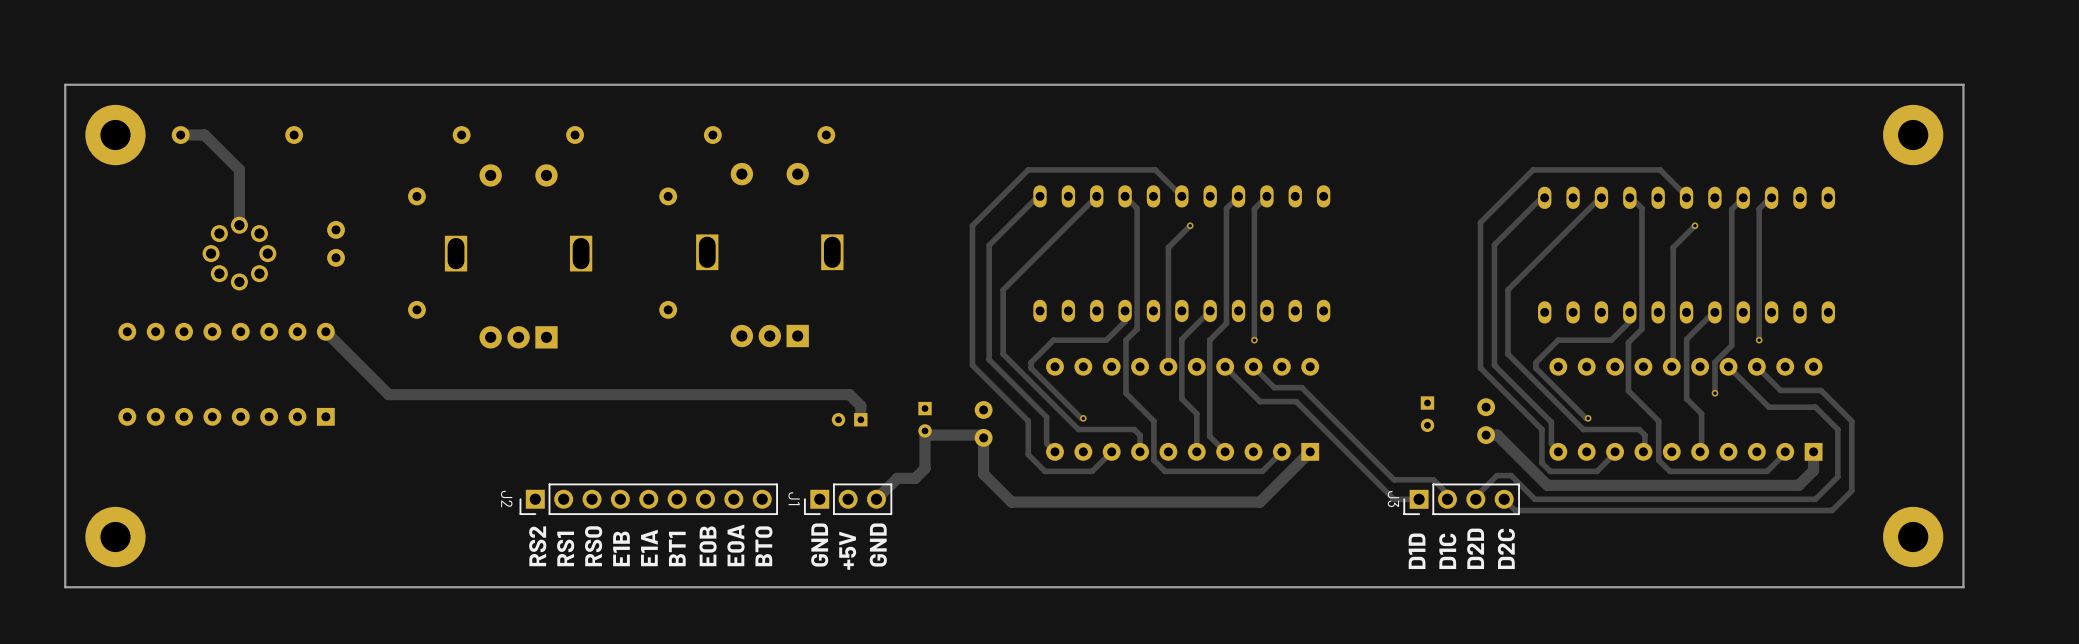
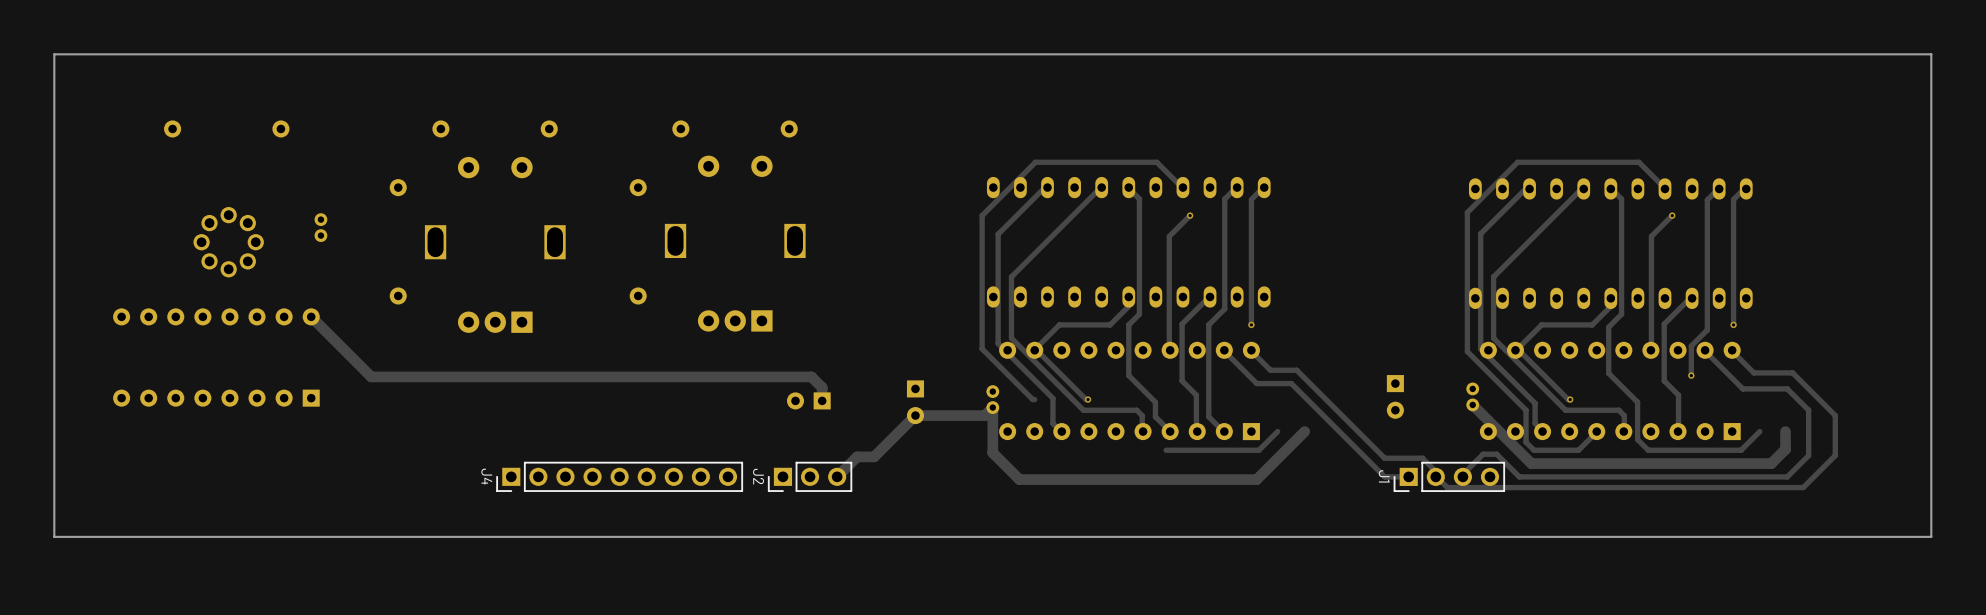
board edge: (1963, 84) (65, 84) (65, 587) (1963, 587) (1963, 84) -> (1931, 54) (1931, 536) (54, 536) (54, 54) (1931, 54)
part: (115, 135) -> none
track: (180, 135) (204, 135) (239, 169) (239, 225) -> none
part: (1913, 135) -> none
track: (1084, 169) (1028, 169) (972, 225) (972, 365) (1028, 421) (1028, 454) (1045, 471) (1092, 471) (1111, 451) -> (1035, 162) (982, 215) (982, 348) (984, 351)
track: (1155, 169) (1181, 196) -> (1103, 162) (1156, 162) (1182, 187)
track: (1588, 169) (1533, 169) (1480, 222) (1480, 368) (1541, 429) (1541, 463) (1550, 471) (1596, 471) (1616, 451) -> (1517, 162) (1467, 212) (1467, 351) (1526, 410) (1526, 442) (1534, 450) (1578, 450) (1597, 431)
track: (1660, 169) (1686, 196) -> (1585, 162) (1638, 162) (1664, 187)
track: (1040, 196) (989, 245) (989, 359) (1046, 417) (1046, 443) (1054, 451) -> (1046, 187) (998, 234) (998, 343) (1052, 398) (1052, 423) (1060, 431)
track: (1096, 196) (1003, 289) (1003, 354) (1078, 429) (1134, 429) (1140, 435) (1140, 451) -> (1100, 187) (1011, 276) (1011, 338) (1083, 410) (1136, 410) (1142, 415) (1142, 431)
track: (1125, 196) (1137, 208) (1137, 329) (1125, 340) (1125, 393) (1153, 421) (1153, 460) (1165, 471) (1220, 471) -> none
track: (1238, 196) (1226, 208) (1226, 323) (1209, 340) (1209, 421) -> none
track: (1266, 196) (1254, 208) (1254, 340) -> (1263, 187) (1251, 199) (1251, 324)
track: none -> (1236, 187) (1224, 199) (1224, 308) (1208, 324) (1208, 416) (1223, 431)
track: (1544, 196) (1494, 244) (1494, 365) (1551, 422) (1551, 443) (1559, 451) -> (1528, 187) (1480, 233) (1480, 348) (1535, 403) (1535, 423) (1543, 431)
track: (1601, 196) (1507, 289) (1507, 354) (1583, 429) (1639, 429) (1644, 435) (1644, 451) -> (1582, 187) (1493, 276) (1493, 338) (1565, 410) (1618, 410) (1624, 415) (1624, 431)
track: (1629, 196) (1641, 208) (1641, 329) (1628, 342) (1628, 390) (1658, 421) (1658, 460) (1669, 471) (1725, 471) -> (1610, 187) (1621, 199) (1621, 314) (1608, 327) (1608, 373) (1637, 402) (1637, 439) (1648, 450)
track: (1771, 196) (1759, 208) (1759, 340) -> (1745, 187) (1733, 199) (1733, 324)
track: (1743, 197) (1731, 209) (1731, 345) (1714, 362) (1714, 393) -> (1718, 188) (1707, 199) (1707, 330) (1691, 346) (1691, 375)
part footprint: [327, 221, 345, 267] -> [314, 213, 328, 243]
track: (1190, 225) (1168, 247) (1168, 366) -> (1190, 215) (1169, 236) (1169, 350)
via position: (1190, 225) -> (1190, 215)
track: (1695, 225) (1673, 247) (1673, 366) -> (1672, 215) (1651, 236) (1651, 350)
via position: (1695, 225) -> (1672, 215)
track: (1125, 310) (1125, 321) (1106, 340) (1053, 340) (1031, 362) (1031, 368) -> none
track: none -> (1127, 296) (1127, 307) (1110, 324) (1059, 324) (1038, 346) (1038, 351) (1088, 399)
track: (1210, 310) (1181, 340) -> (1127, 187) (1139, 199) (1139, 314) (1128, 324)
track: none -> (1209, 296) (1182, 324) (1182, 380) (1196, 395) (1196, 431)
track: (1629, 310) (1629, 321) (1611, 340) (1558, 340) (1535, 362) (1535, 368) (1588, 418) -> (1610, 296) (1610, 307) (1592, 324) (1541, 324) (1520, 346) (1520, 351) (1570, 399)
track: (1714, 310) (1686, 339) (1686, 398) (1701, 413) (1701, 451) -> (1691, 296) (1664, 324) (1664, 380) (1678, 395) (1678, 431)
via position: (1254, 340) -> (1251, 324)
via: (1759, 340) -> none
via: none -> (1733, 324)
track: (1225, 366) (1259, 401) (1296, 401) (1393, 499) (1419, 499) -> none
track: (1253, 366) (1274, 387) (1301, 387) -> (1223, 350) (1243, 370)
track: none -> (1250, 350) (1270, 370) (1296, 370) (1384, 458) (1422, 458) (1435, 471) (1435, 476)
track: (1728, 366) (1768, 407) (1815, 407) (1837, 429) (1837, 476) (1815, 499) -> (1704, 350) (1742, 388) (1787, 388) (1808, 410) (1808, 455) (1787, 476) (1734, 476)
track: (1756, 366) (1780, 390) (1821, 390) (1851, 421) (1851, 490) (1832, 510) -> (1731, 350) (1753, 372) (1792, 372) (1835, 415) (1835, 455) (1803, 487) (1749, 487)
track: (1181, 393) (1181, 398) (1196, 413) (1196, 451) -> (1128, 375) (1155, 402)
via: (1714, 393) -> none
via: none -> (1691, 375)
track: (1315, 401) (1393, 479) (1433, 479) (1447, 493) (1447, 499) -> (1256, 383) (1291, 383) (1384, 476) (1408, 476)
part footprint: [831, 413, 868, 427] -> [786, 392, 831, 410]
part: (1427, 414) -> none
part: none -> (1395, 396)
part: none -> (1472, 396)
part: none -> (992, 399)
via position: (1083, 418) -> (1088, 399)
via: (1588, 418) -> none
via: none -> (1570, 399)
part: (925, 419) -> none
part: none -> (915, 402)
part: (1486, 421) -> none
part: (983, 423) -> none
track: (958, 435) (929, 435) (925, 430) (925, 468) -> (915, 415) (883, 447)
track: (980, 435) (983, 437) (983, 474) (1011, 502) (1067, 502) -> (936, 415) (984, 415) (992, 407) (992, 452) (1019, 479)
track: (1486, 435) (1497, 435) (1547, 485) (1603, 485) -> (1472, 404) (1531, 463)
track: (1281, 451) (1262, 471) -> (1277, 431) (1258, 450) (1205, 450)
track: (1310, 451) (1259, 502) -> (1304, 431) (1256, 479) (1203, 479)
track: (1786, 451) (1767, 471) -> (1759, 431) (1741, 450) (1687, 450)
track: (1813, 451) (1813, 470) (1798, 485) -> (1785, 431) (1785, 449) (1771, 463) (1718, 463)
J1 name: J1 (794, 498) -> J2 (758, 476)
J2 name: J2 (506, 499) -> J4 (486, 476)
J3: (1461, 499) -> none
J1: none -> (1449, 476)
track: (1590, 499) (1534, 499) (1511, 475) (1497, 475) (1475, 496) (1475, 499) -> (1519, 476) (1496, 454) (1483, 454) (1462, 474) (1462, 476)
part: (115, 536) -> none
part: (1913, 536) -> none
text: E0A (735, 545) -> none
text: GND (819, 545) -> none
text: GND (878, 545) -> none
text: RS2 (537, 546) -> none
text: RS0 (593, 546) -> none
text: E0B (708, 546) -> none
text: BT0 (763, 546) -> none
text: RS1 (565, 548) -> none
text: E1B (621, 548) -> none
text: E1A (649, 548) -> none
text: BT1 (677, 548) -> none
text: D2D (1475, 548) -> none
text: D2C (1506, 548) -> none
text: +5V (847, 550) -> none
text: D1D (1417, 551) -> none
text: D1C (1447, 551) -> none

